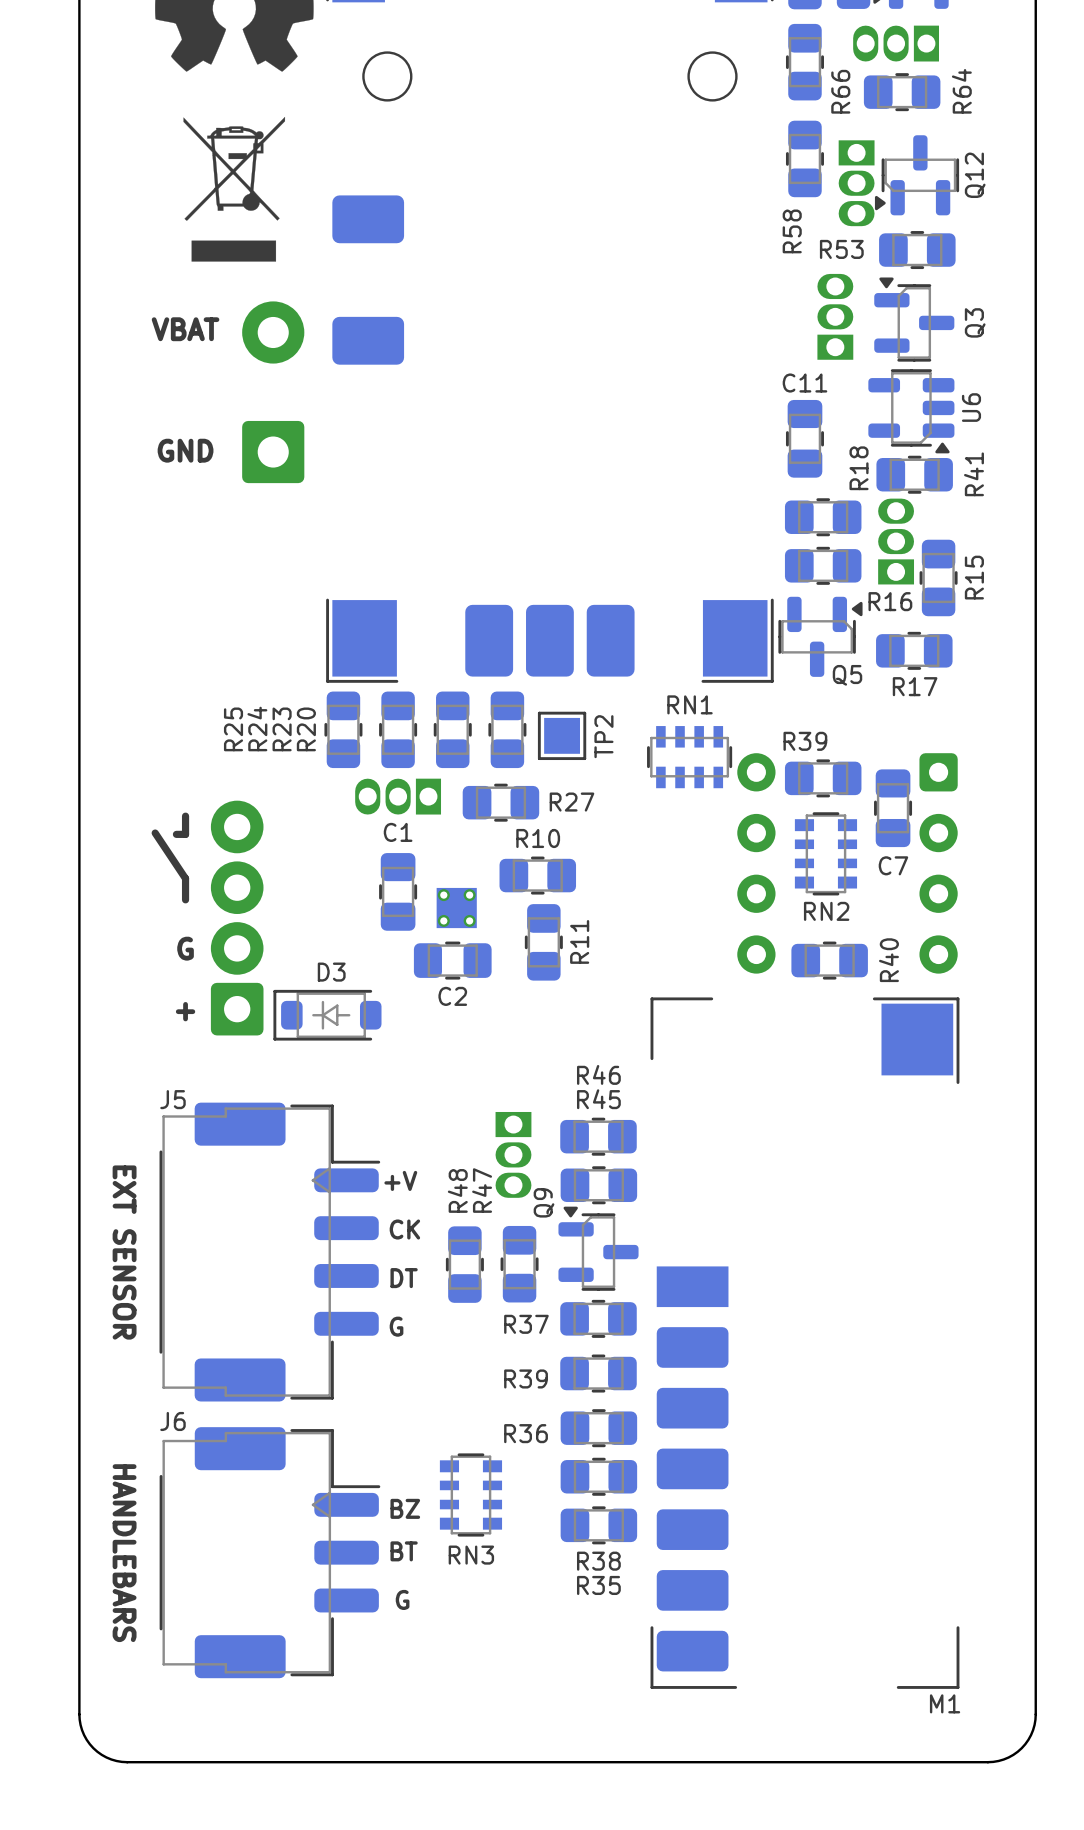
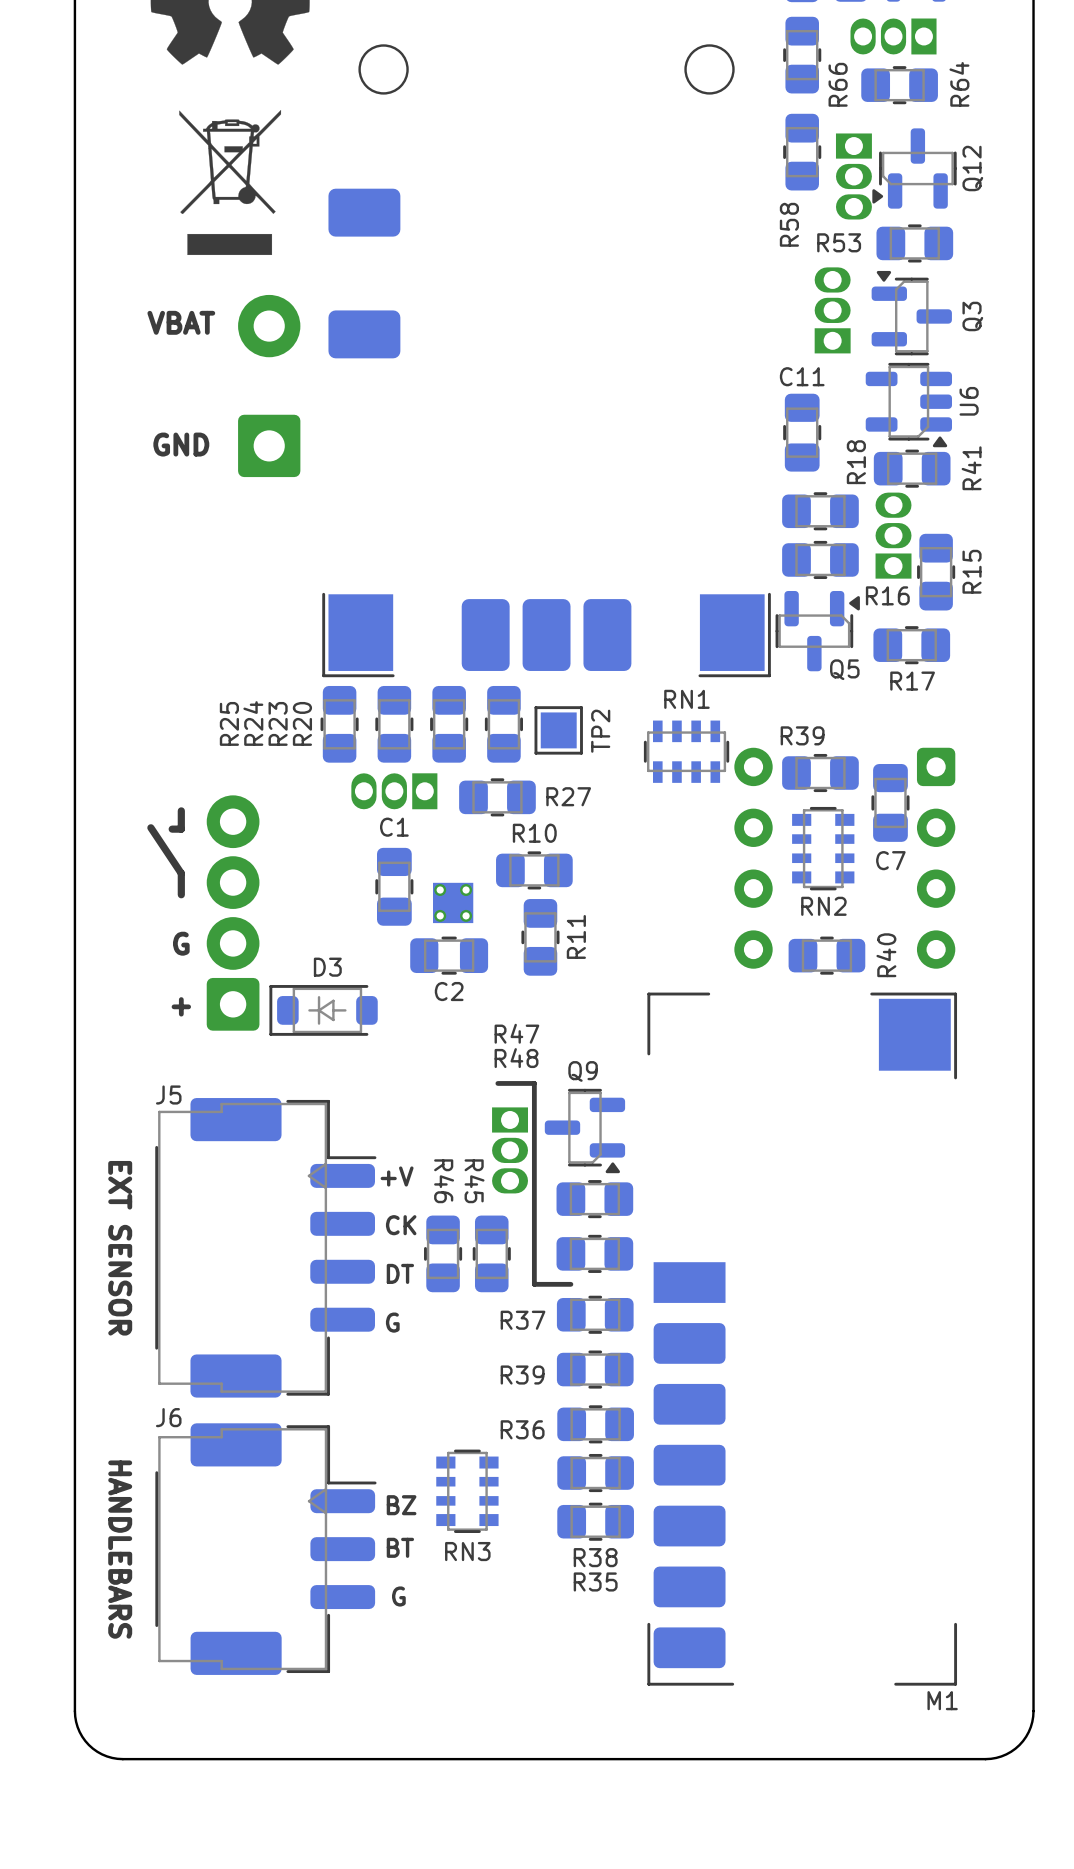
line: none -> (497, 1083) (534, 1083) (534, 1284) (570, 1284)
R46 rotation: 0° (598, 1136) -> 90° clockwise (443, 1253)
R46 position: (598, 1136) -> (443, 1253)
R45 rotation: 0° (598, 1185) -> 90° clockwise (491, 1253)
R45 position: (598, 1185) -> (491, 1253)
R48 name position: R48 (457, 1190) -> R48 (516, 1058)
R47 name position: R47 (482, 1190) -> R47 (516, 1033)
Q9 name position: Q9 (544, 1202) -> Q9 (583, 1071)
Q9 rotation: 0° (598, 1248) -> 180° (584, 1131)
Q9 position: (598, 1248) -> (584, 1131)
R48 rotation: 0° (464, 1264) -> 90° clockwise (594, 1253)
R48 position: (464, 1264) -> (594, 1253)
R47 rotation: 0° (519, 1264) -> 90° clockwise (594, 1199)
R47 position: (519, 1264) -> (594, 1199)

